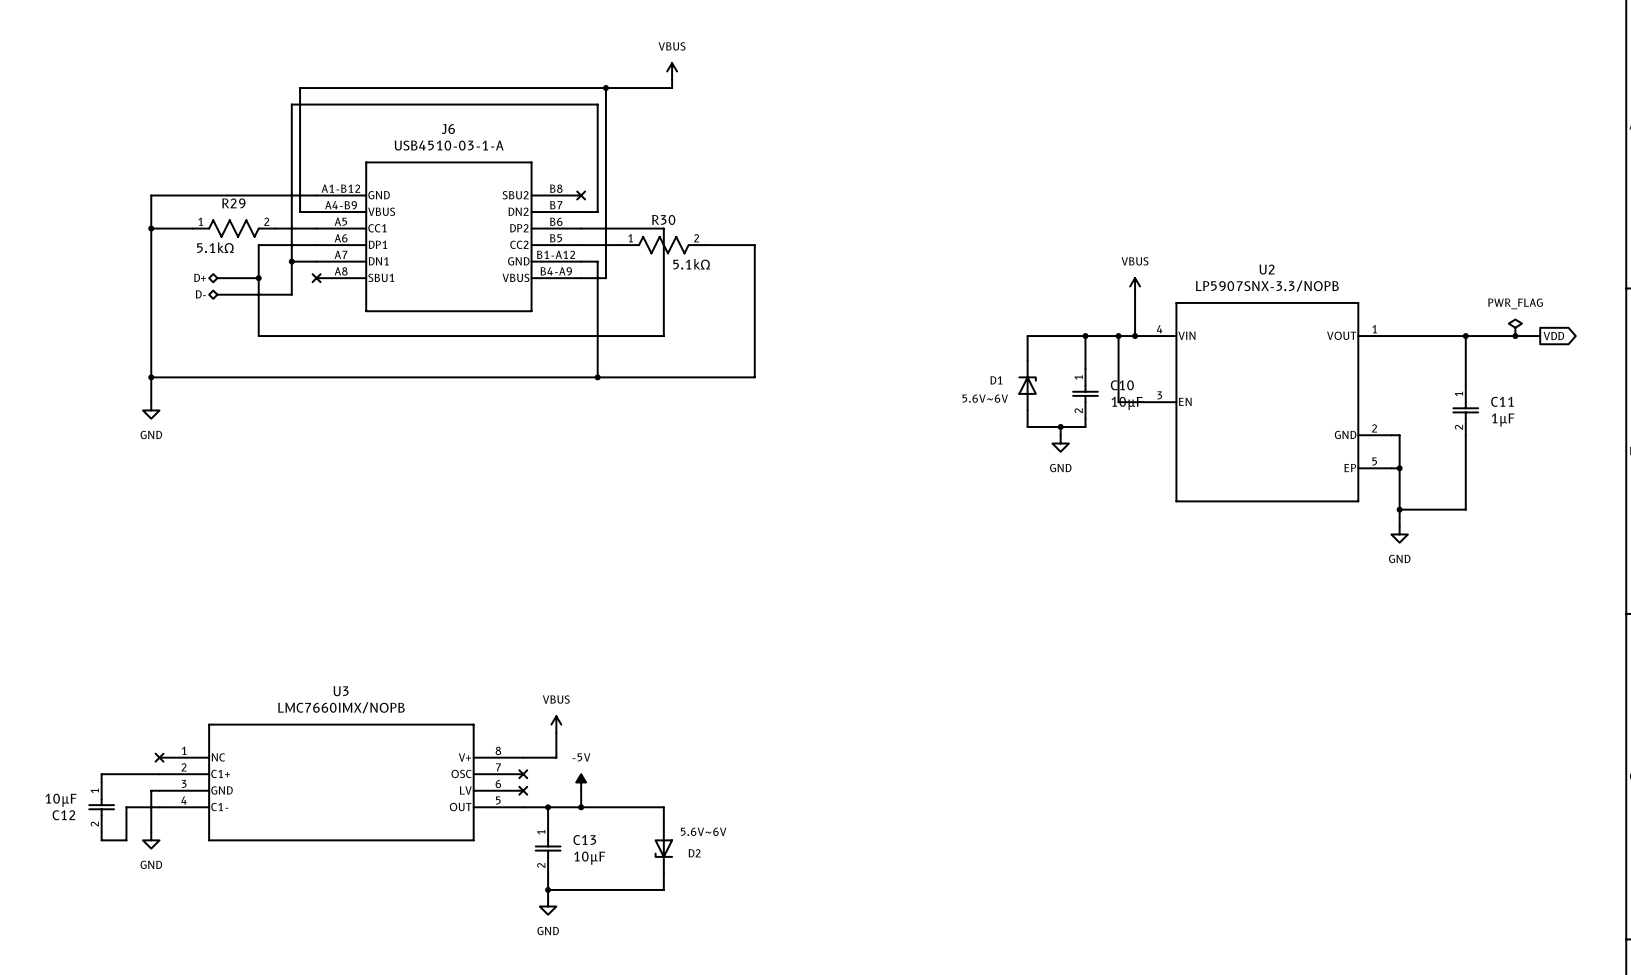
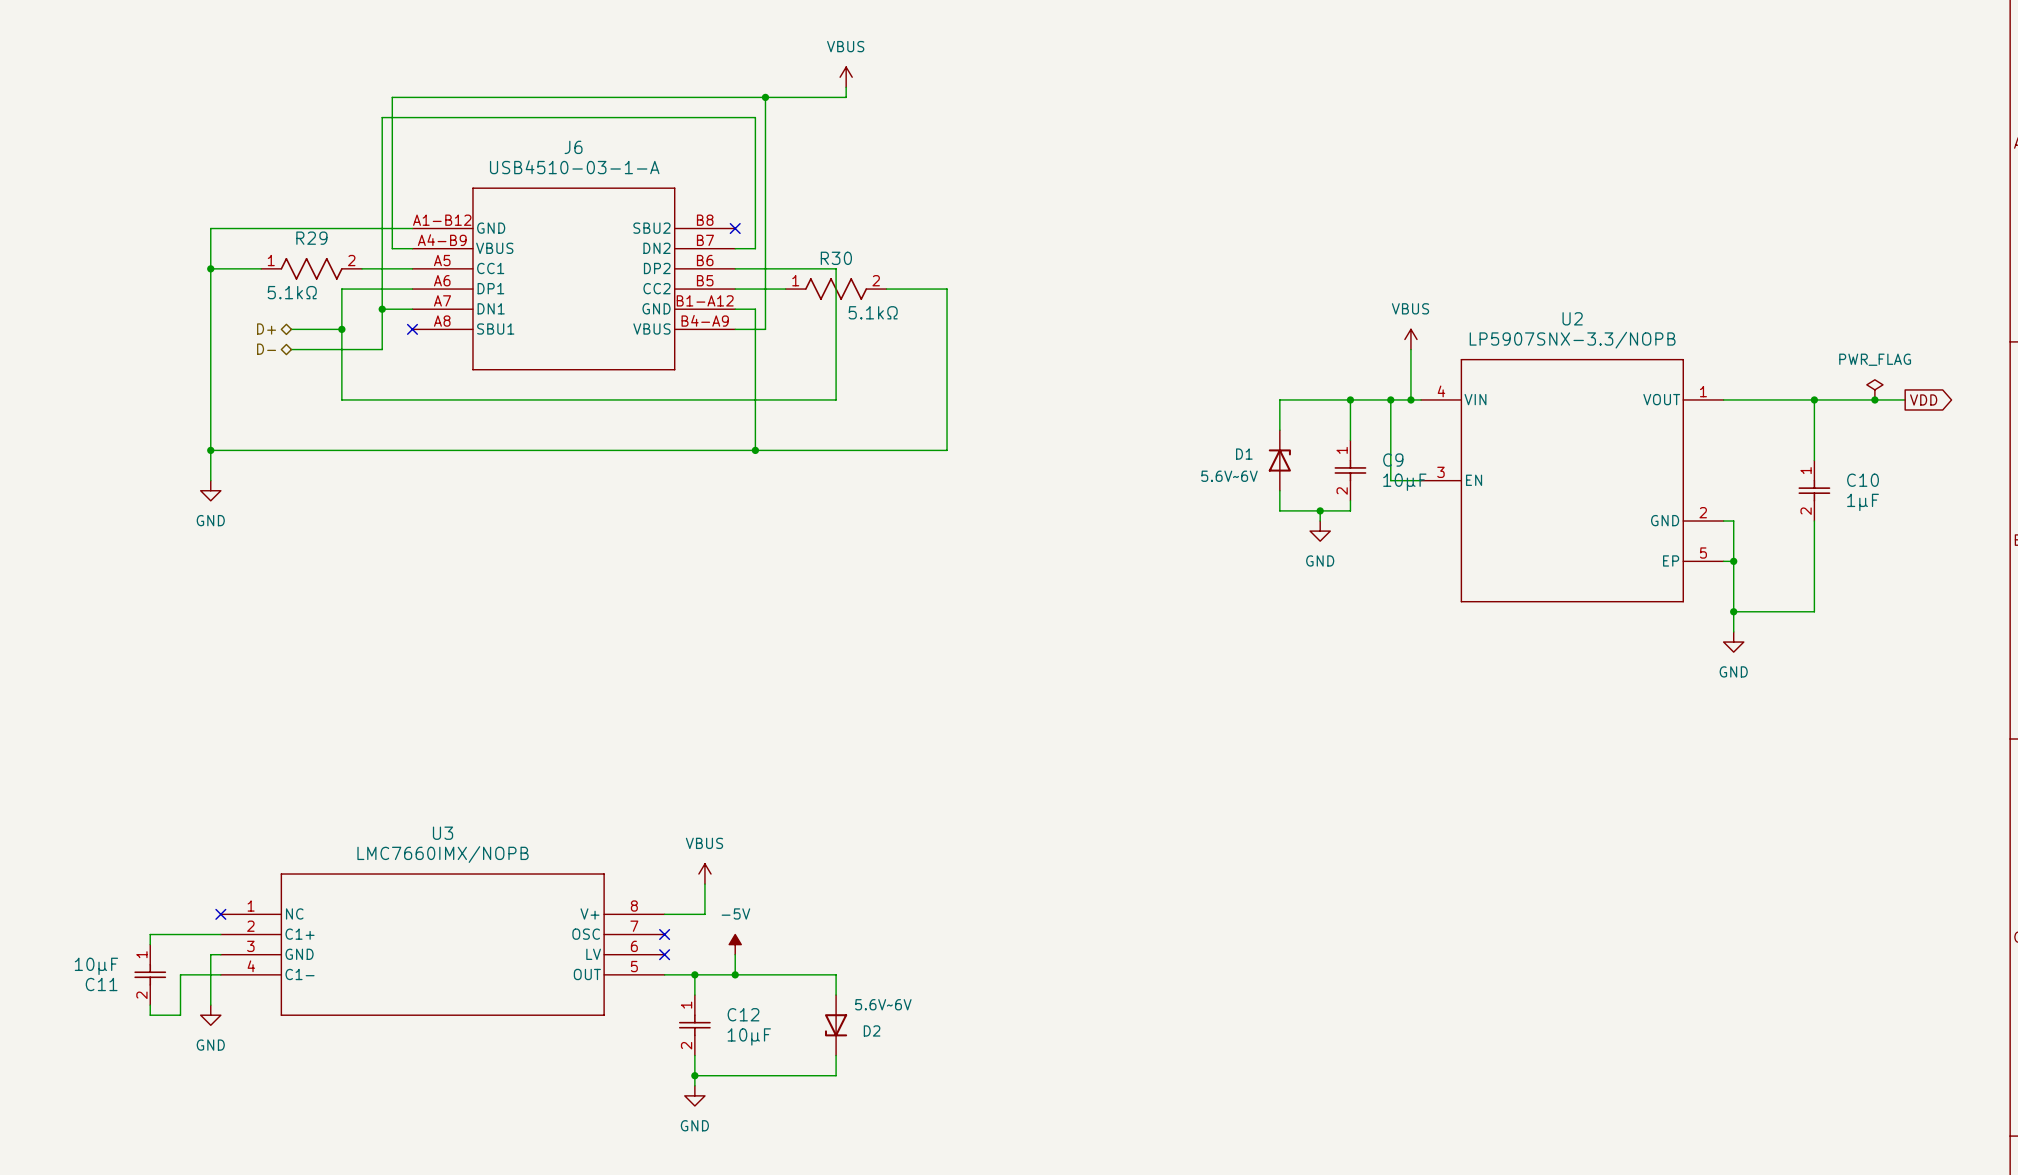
C10 name: C10 (1122, 385) -> C9 (1393, 460)
C11 name: C11 (1502, 401) -> C10 (1863, 480)
C12 name: C12 (63, 815) -> C11 (101, 984)
C13 name: C13 (584, 840) -> C12 (743, 1014)

